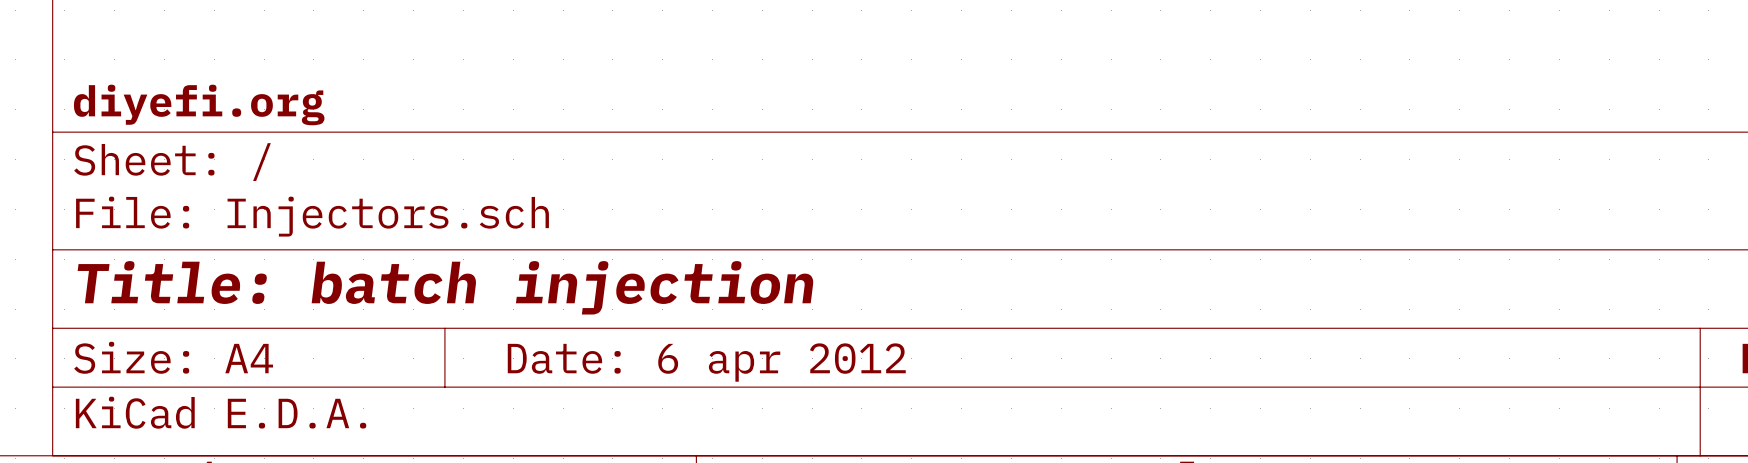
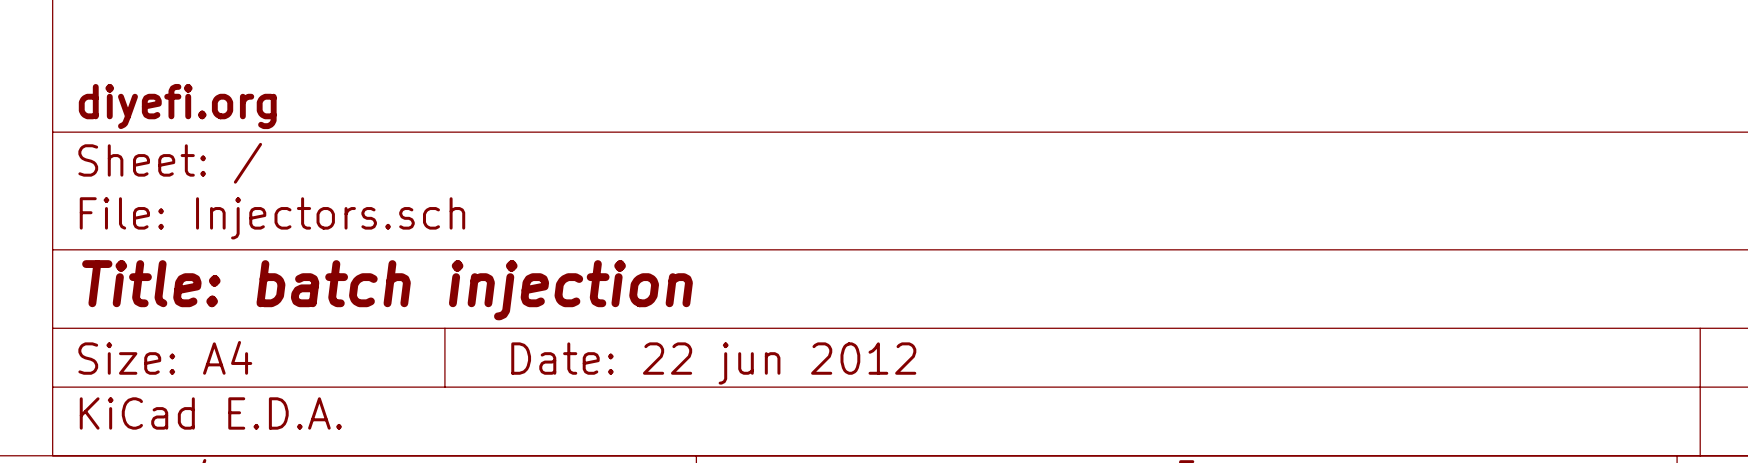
title block: Date: 6 apr 2012 (706, 362) -> Date: 22 jun 2012 (713, 363)

